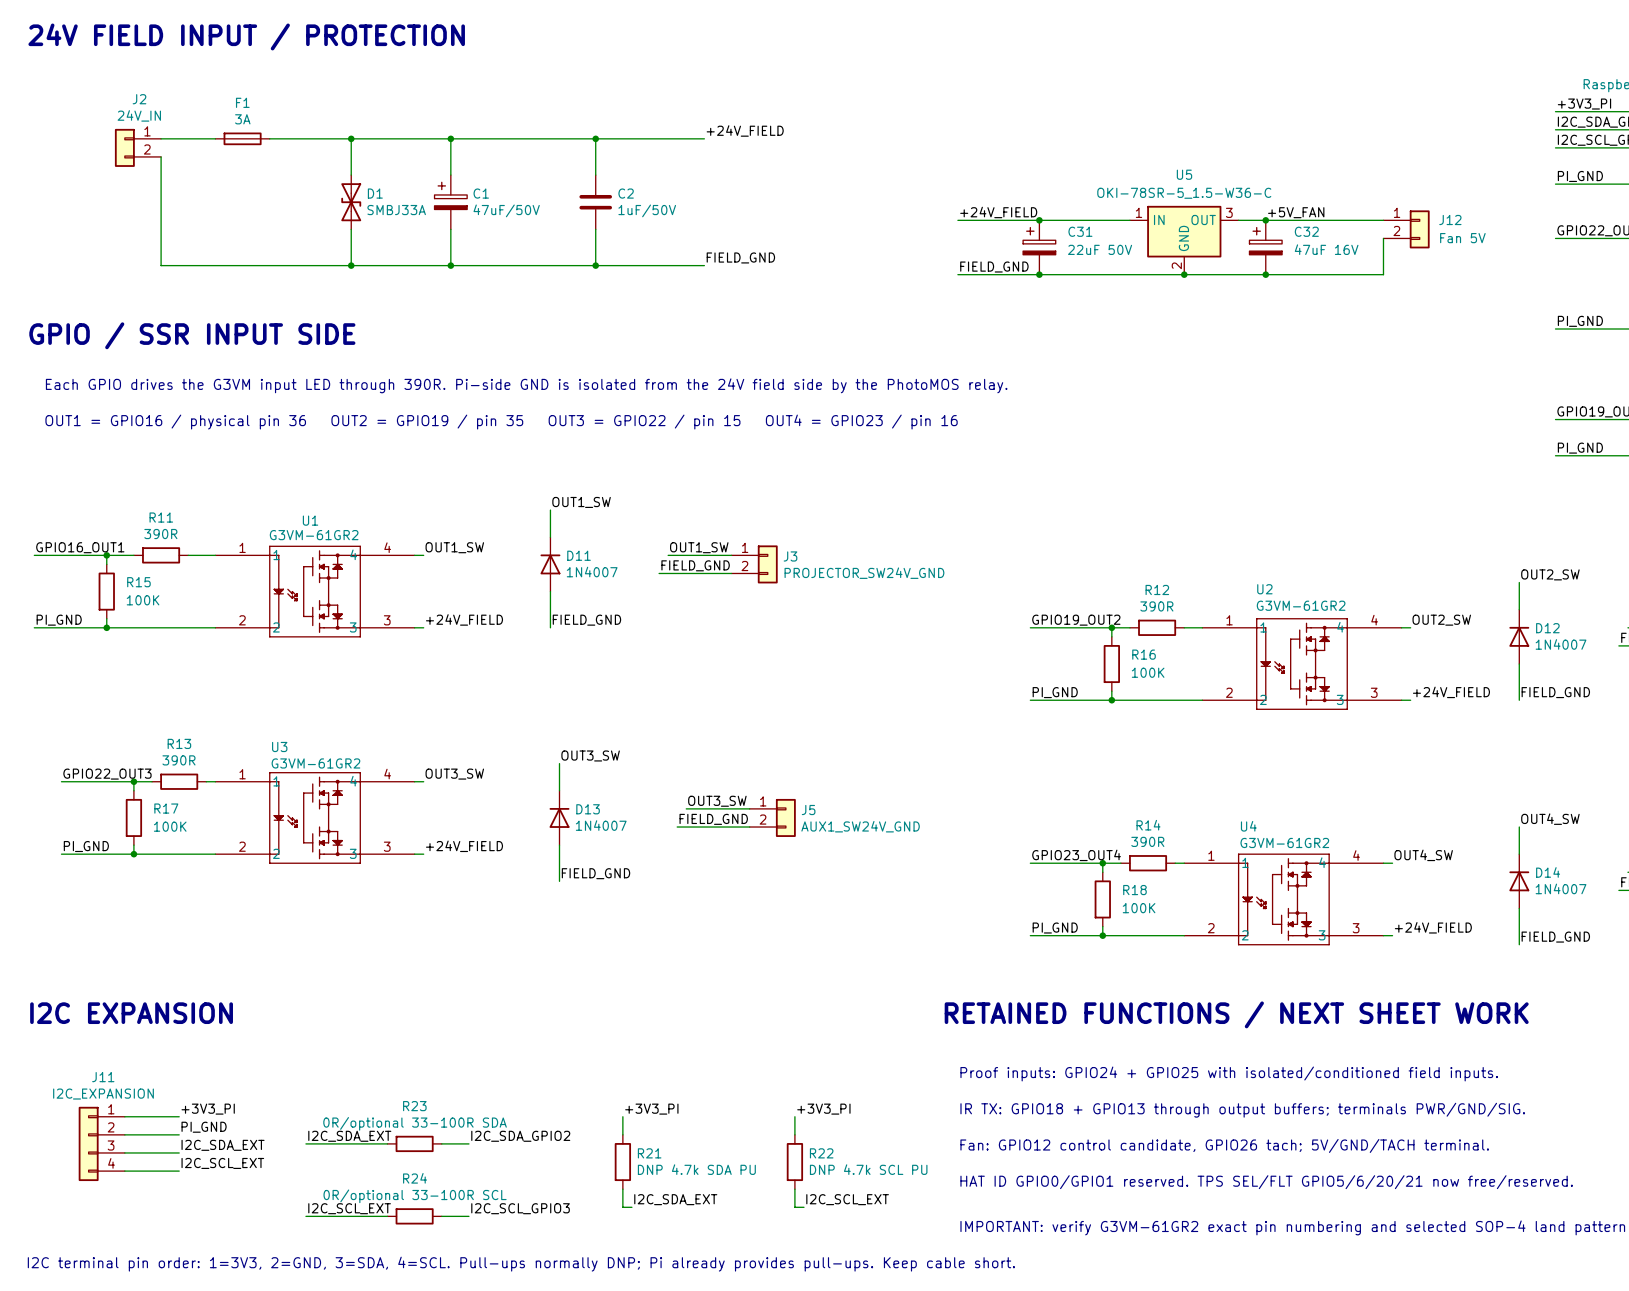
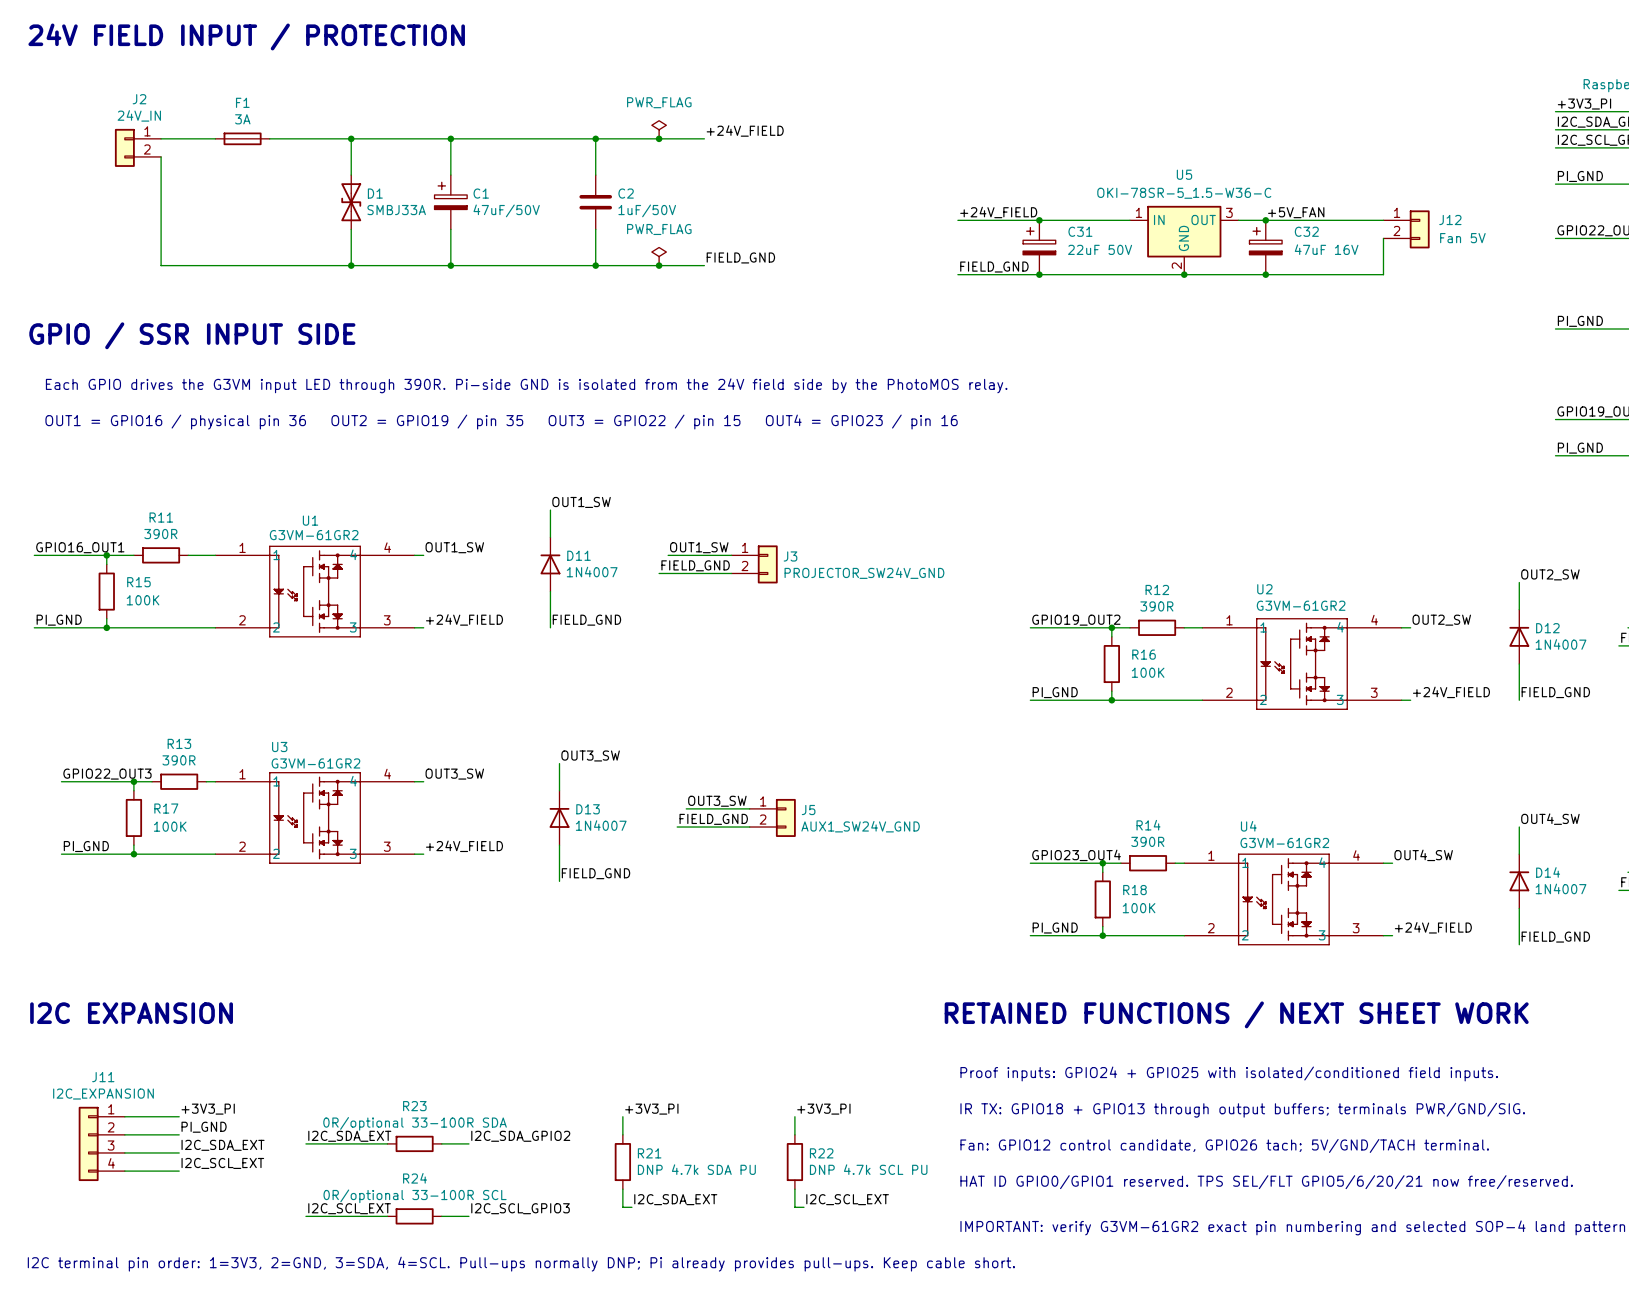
power symbol: none -> PWR_FLAG (659, 129)
junction: none -> (659, 138)
power symbol: none -> PWR_FLAG (659, 256)
junction: none -> (659, 265)

